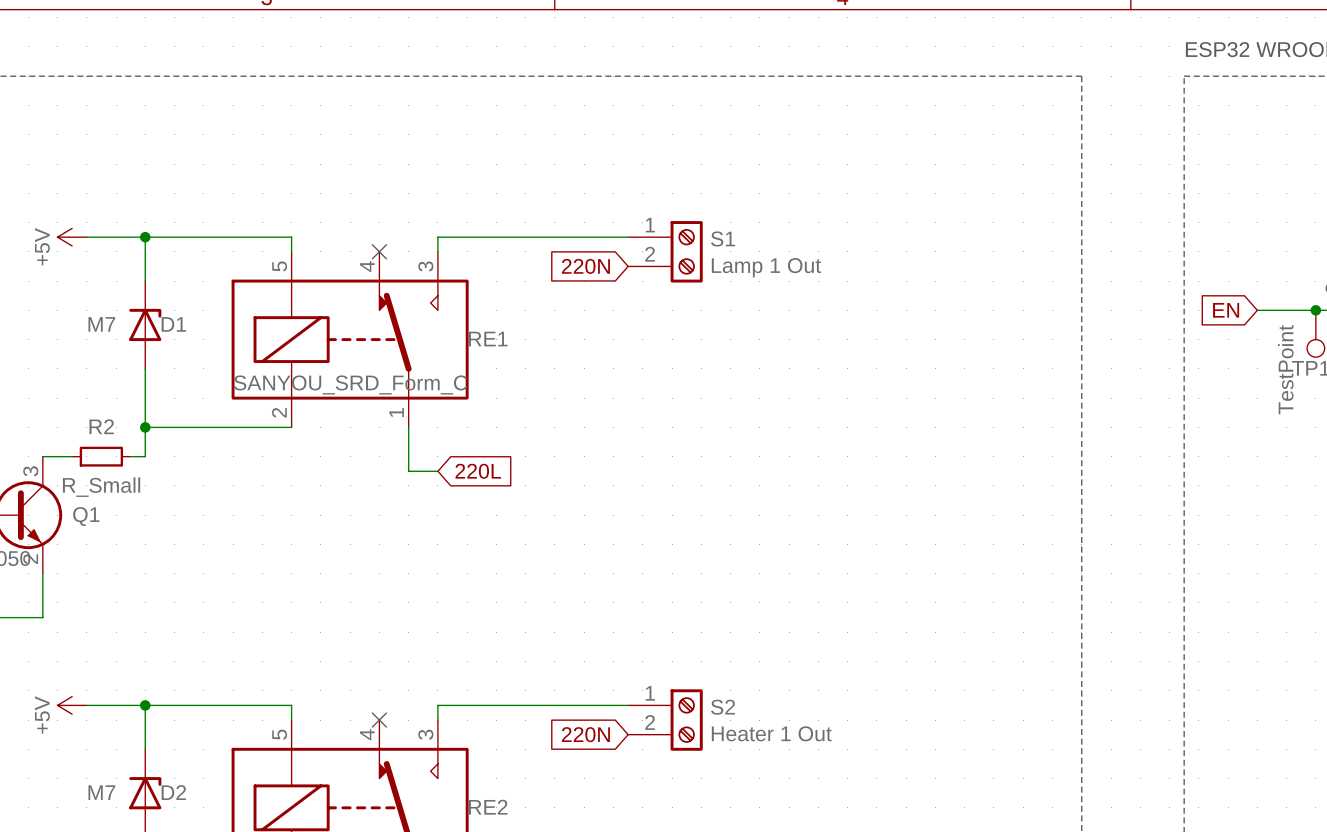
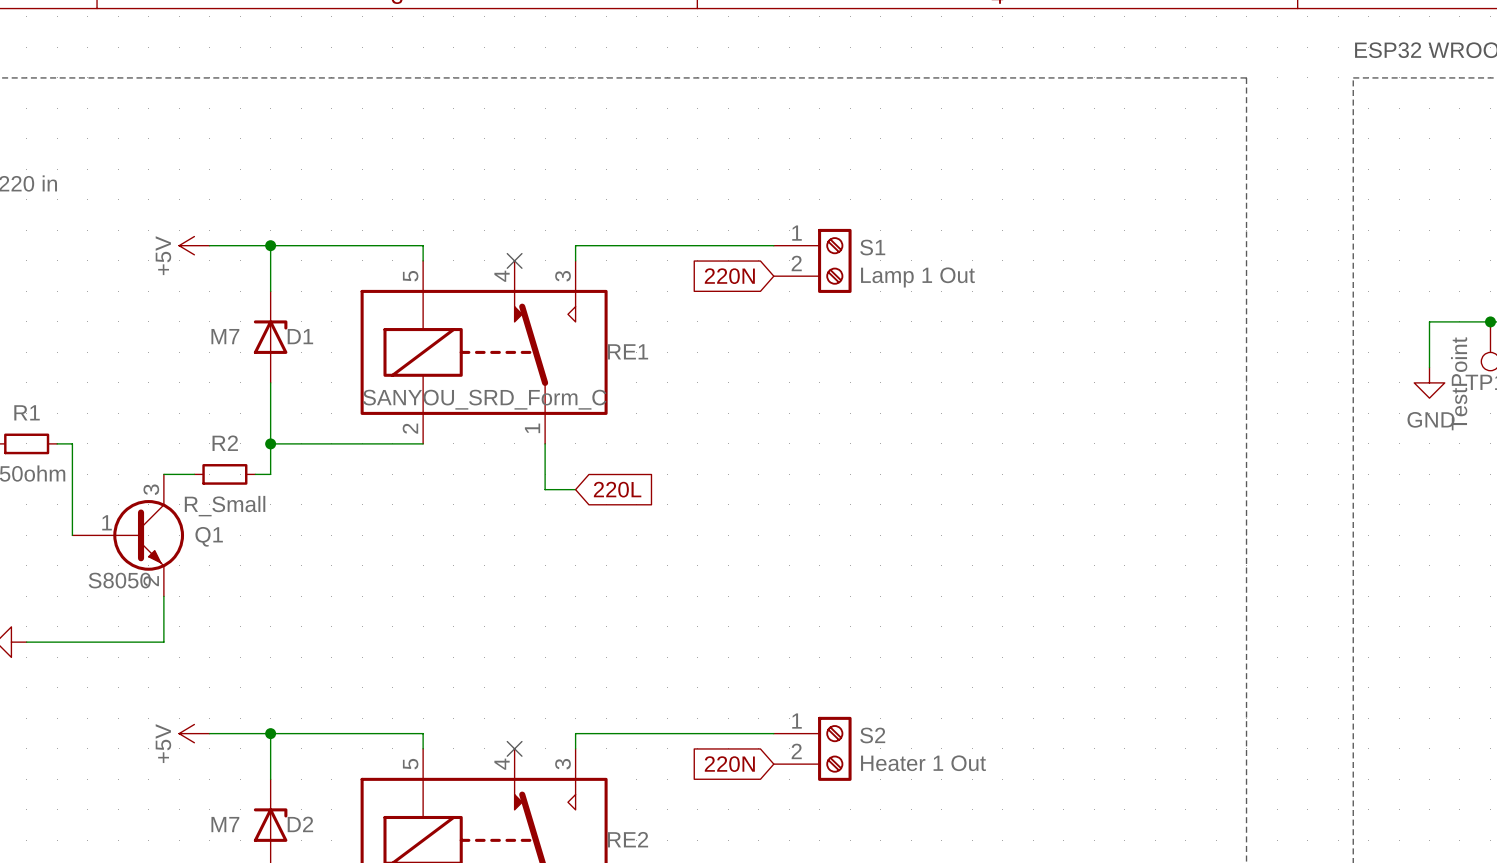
global label: EN (1226, 310) -> none
wire: none -> (1429, 321) (1429, 367)
power symbol: none -> GND (1429, 382)

